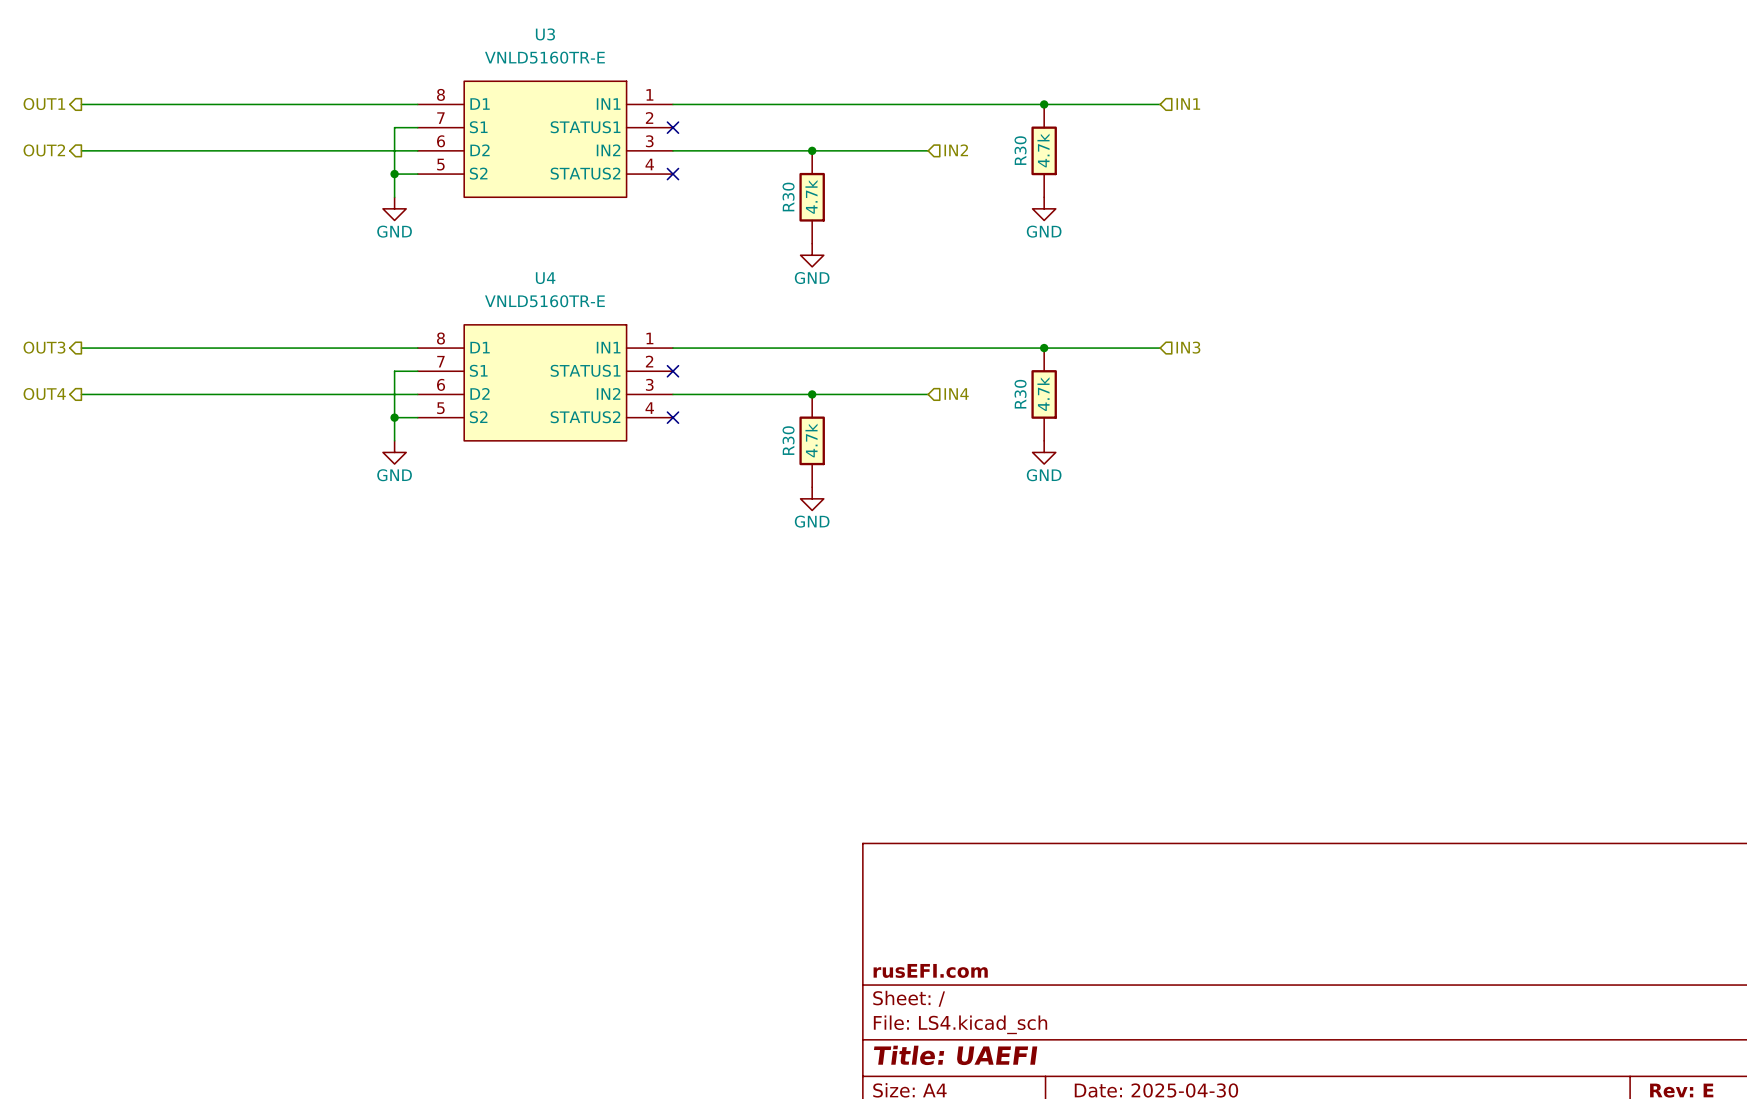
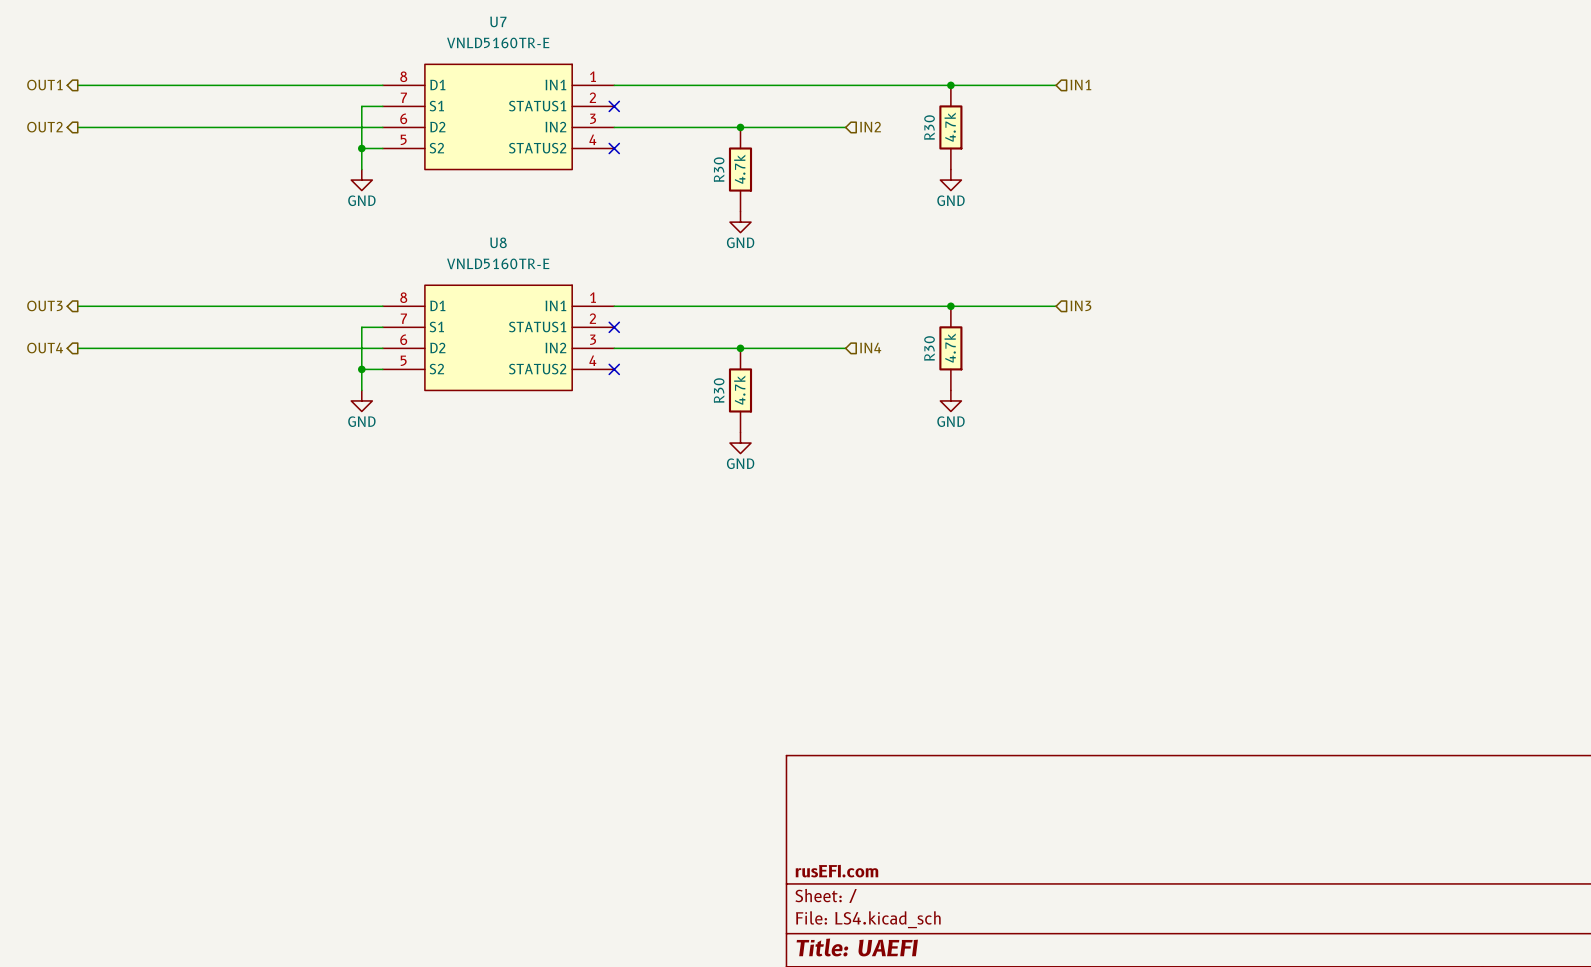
U3 name: U3 (545, 34) -> U7 (498, 21)
U4 name: U4 (545, 278) -> U8 (498, 242)

